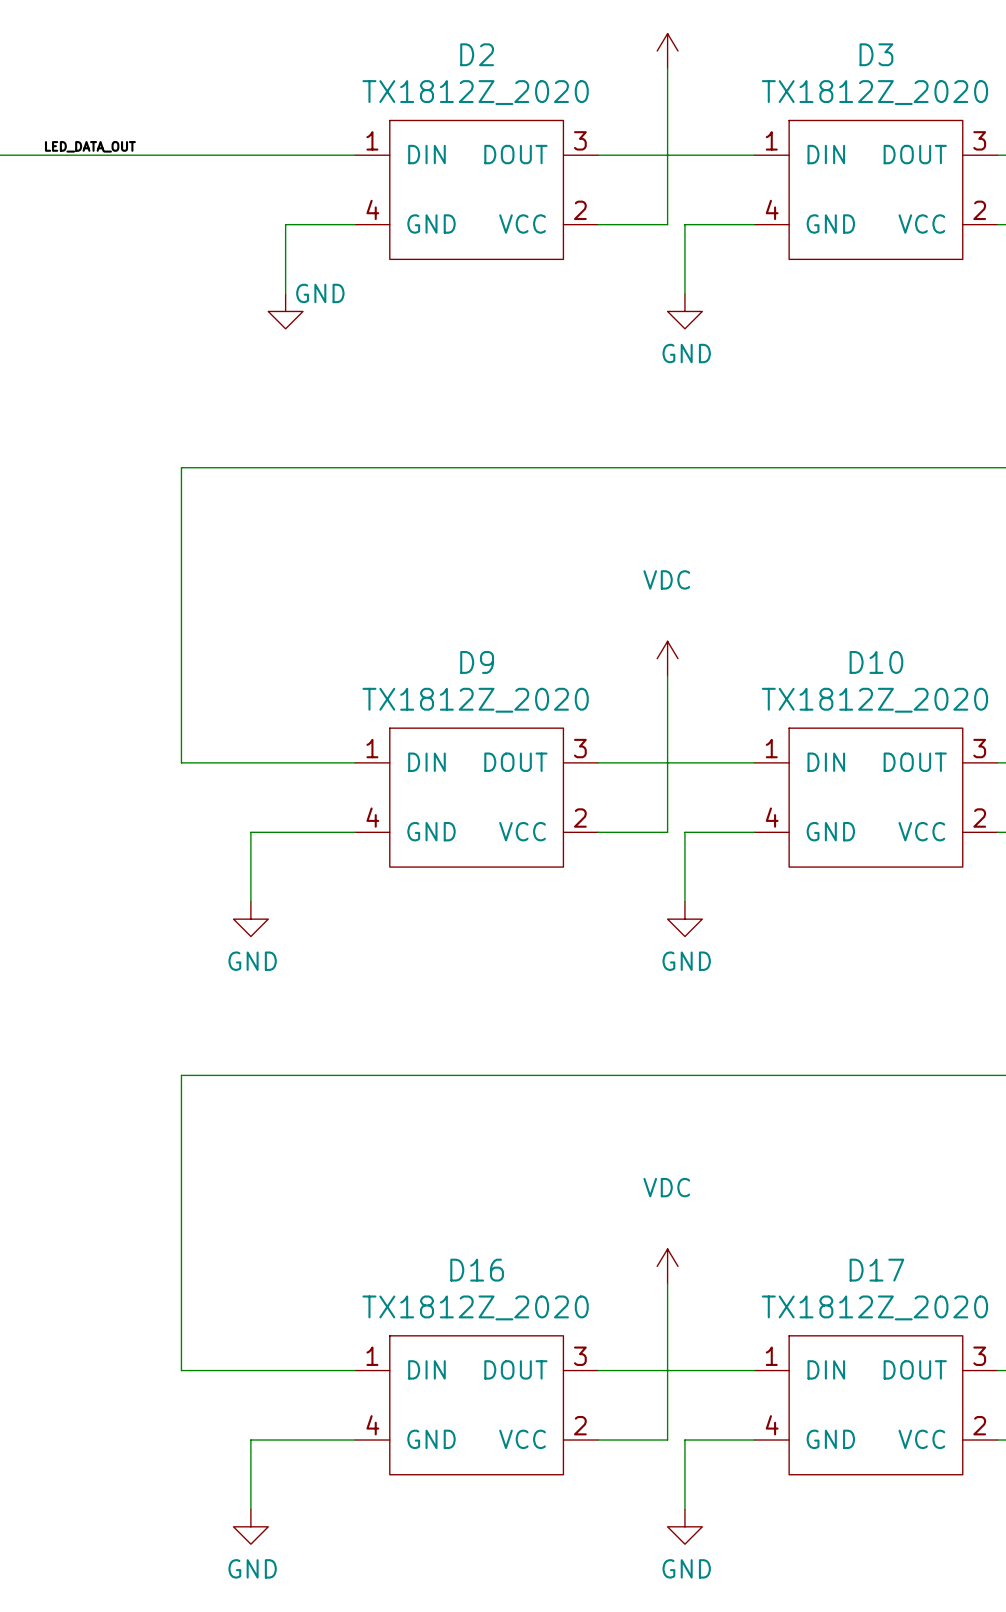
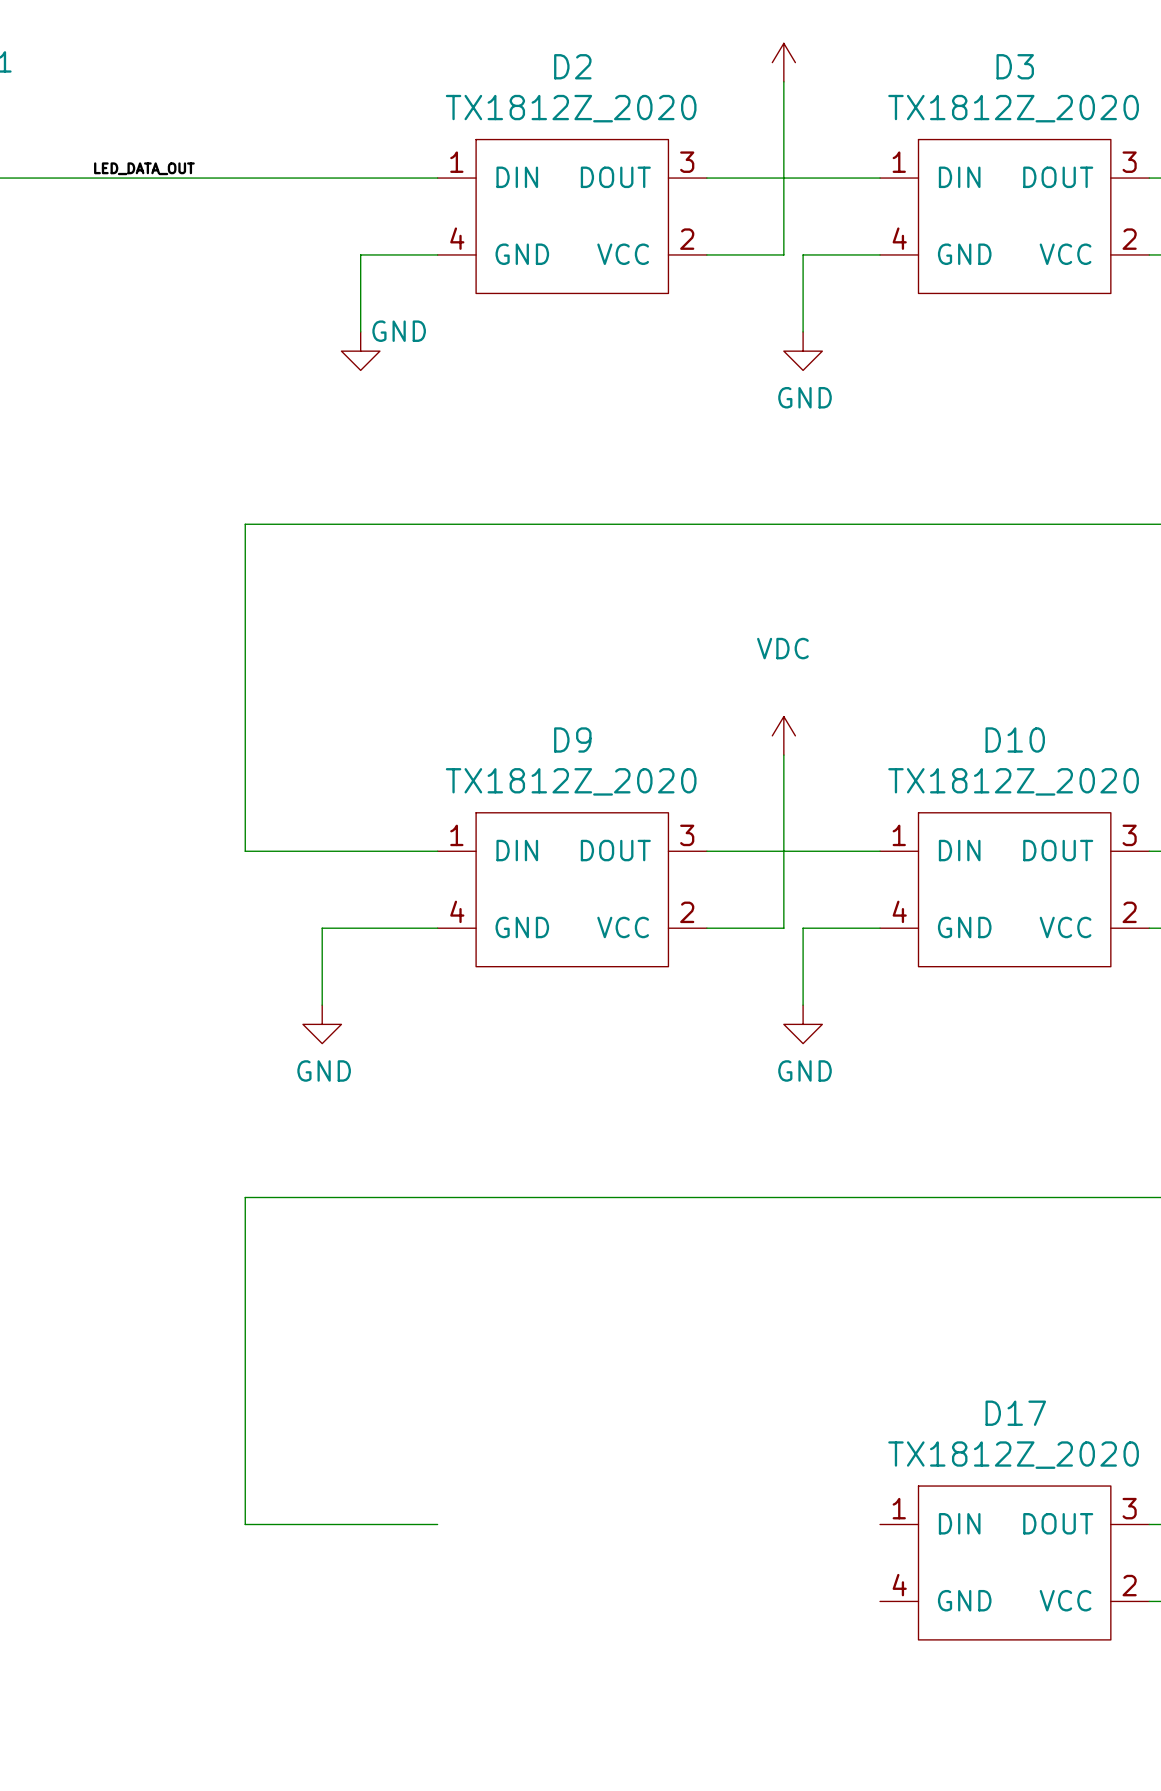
power symbol: VDC (667, 1266) -> none
wire: (667, 1283) (667, 1440) (598, 1440) -> none
wire: (598, 1370) (754, 1370) -> none
D16: TX1812Z_2020 (476, 1405) -> none
wire: (355, 1440) (250, 1440) (250, 1509) -> none
wire: (754, 1440) (684, 1440) (684, 1509) -> none
power symbol: GND (250, 1526) -> none
power symbol: GND (684, 1526) -> none

